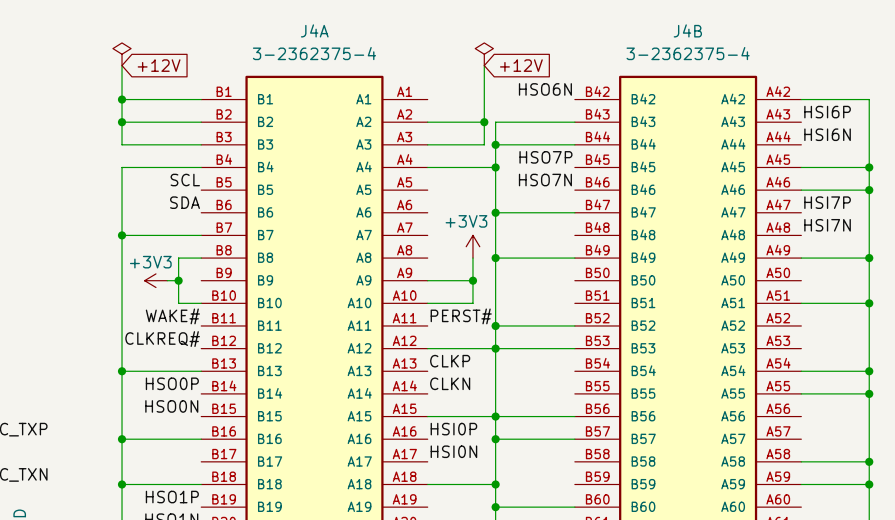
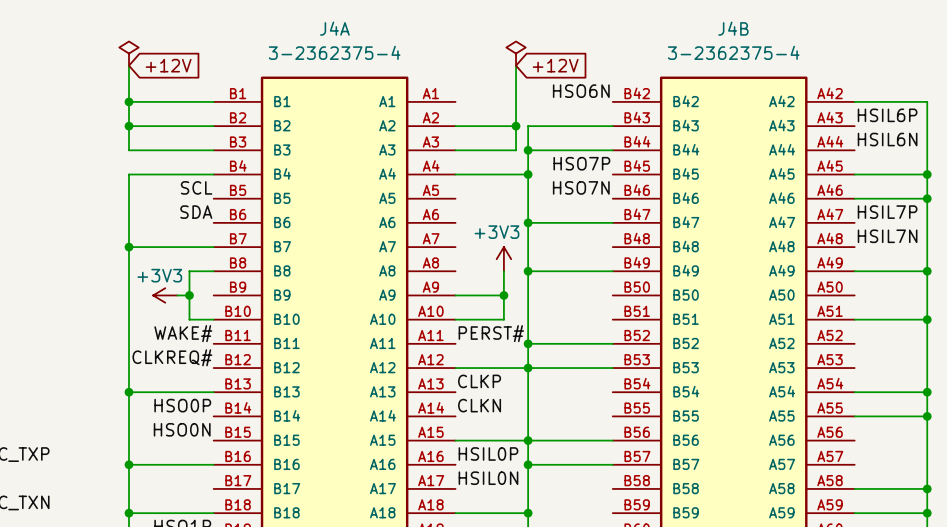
label: HSI6P (827, 112) -> HSIL6P (887, 115)
label: HSI6N (827, 134) -> HSIL6N (887, 139)
label: HSI7P (827, 202) -> HSIL7P (887, 212)
label: HSI7N (827, 225) -> HSIL7N (887, 236)
label: HSI0P (453, 429) -> HSIL0P (488, 453)
label: HSI0N (453, 451) -> HSIL0N (488, 478)

